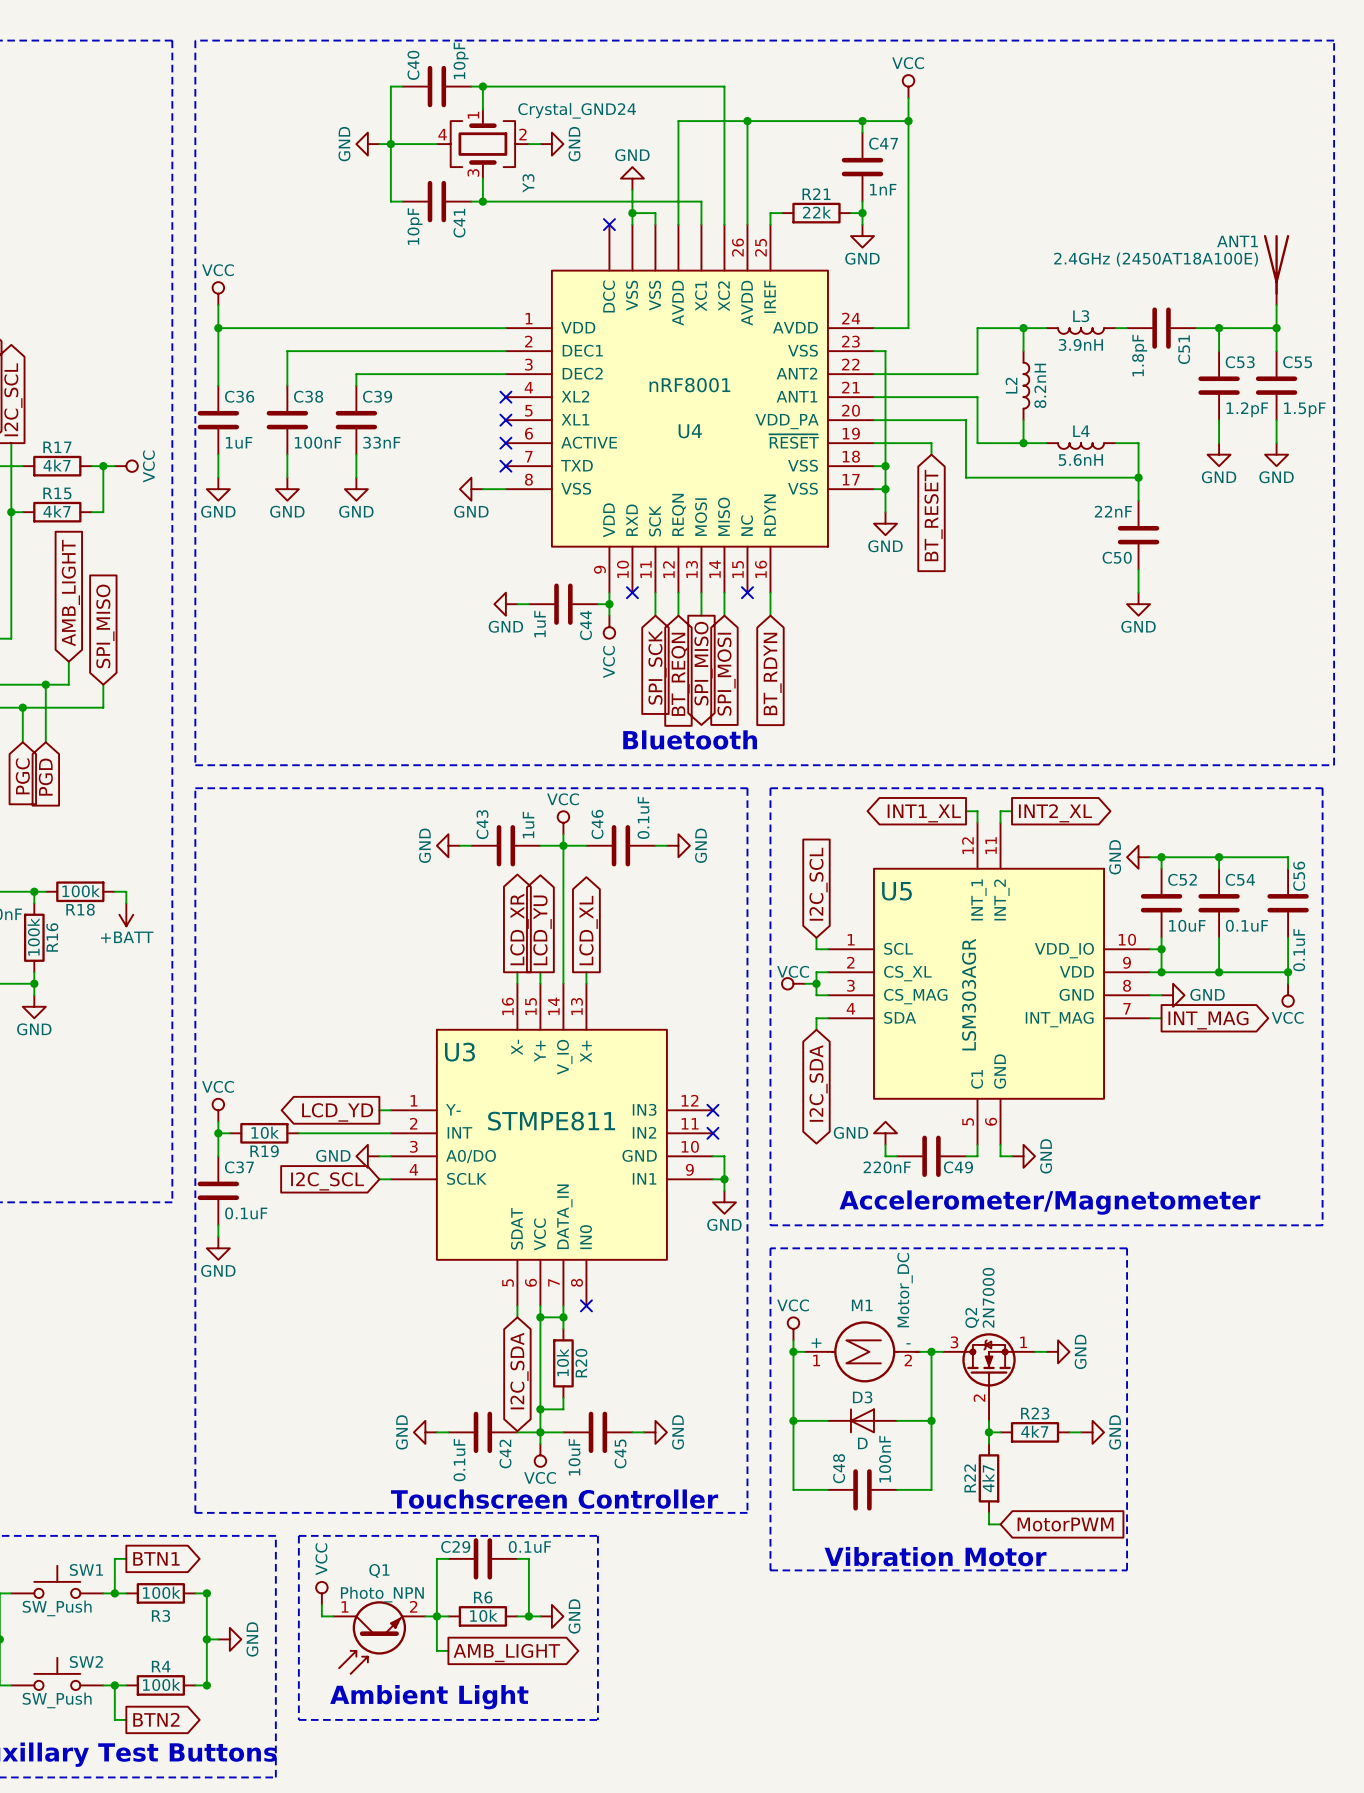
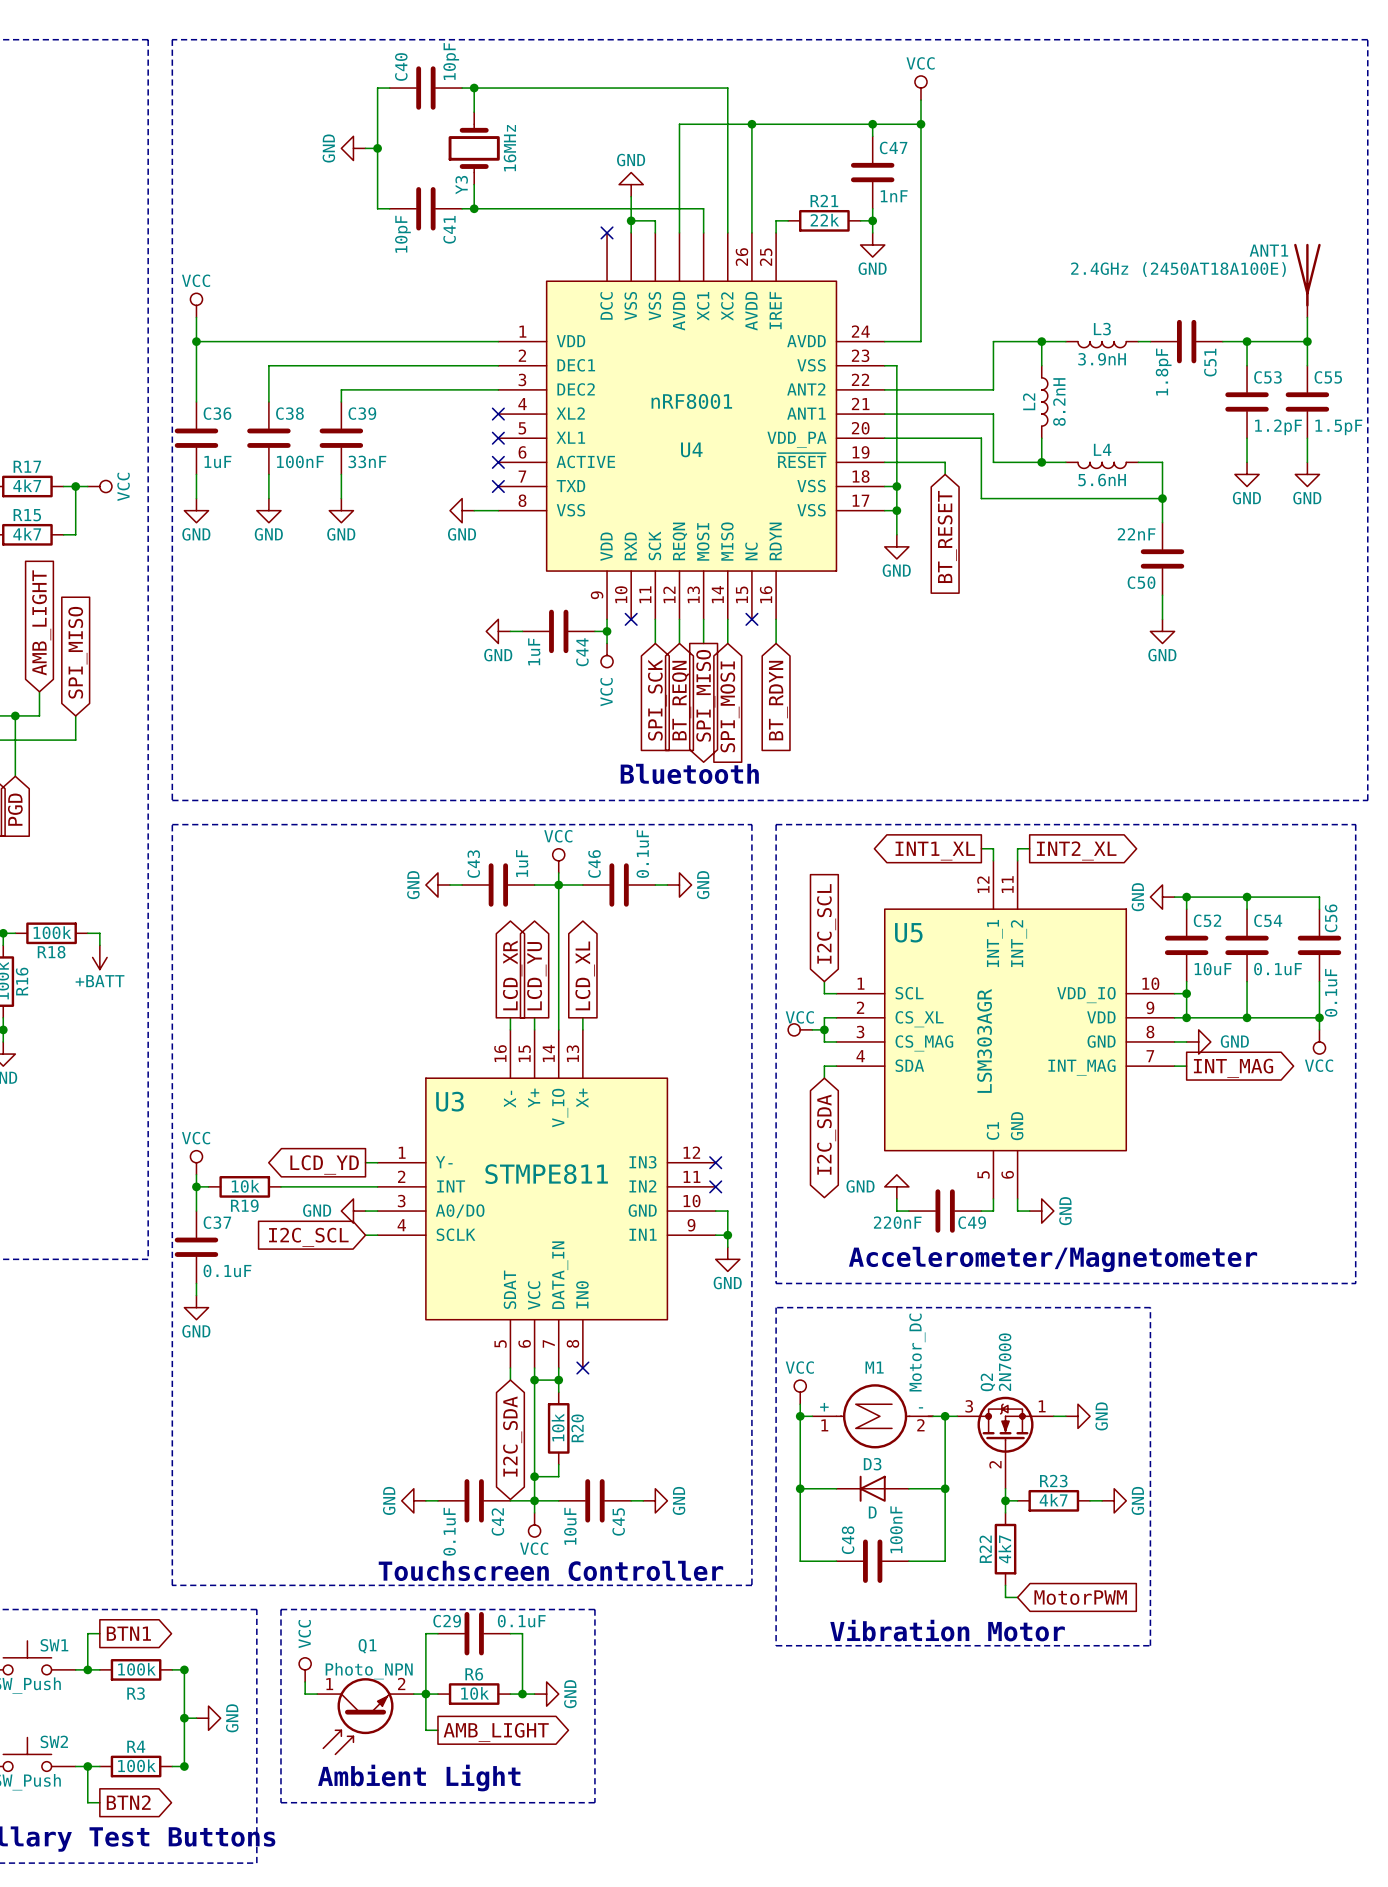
Y3 symbol: [436, 109, 529, 179] -> [448, 112, 500, 185]
Y3 value: Crystal_GND24 (577, 110) -> 16MHz (509, 148)
wire: (390, 144) (436, 144) -> none
wire: (528, 144) (540, 144) -> none
power symbol: GND (551, 144) -> none
Y3 name position: Y3 (528, 183) -> Y3 (461, 185)

